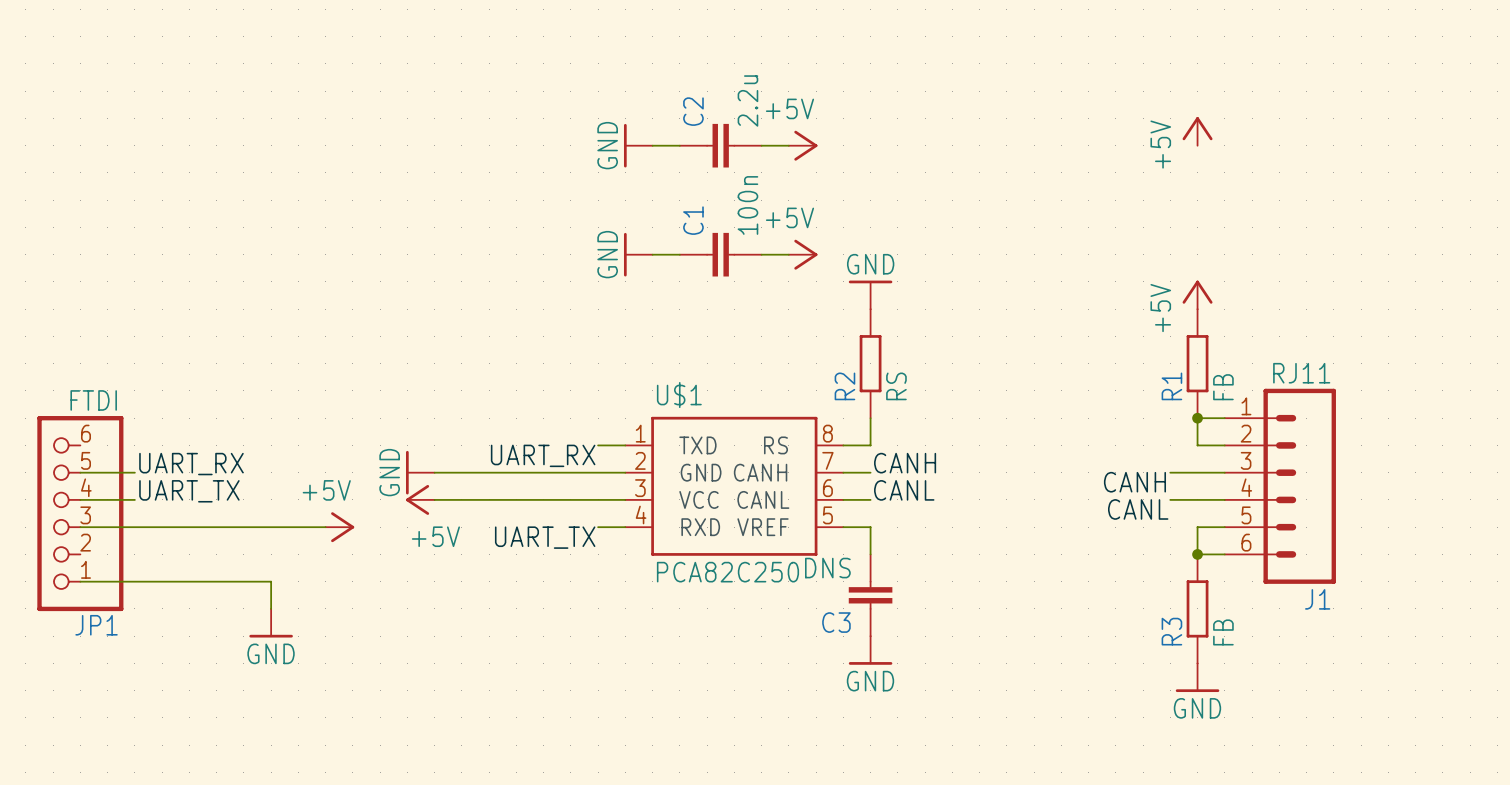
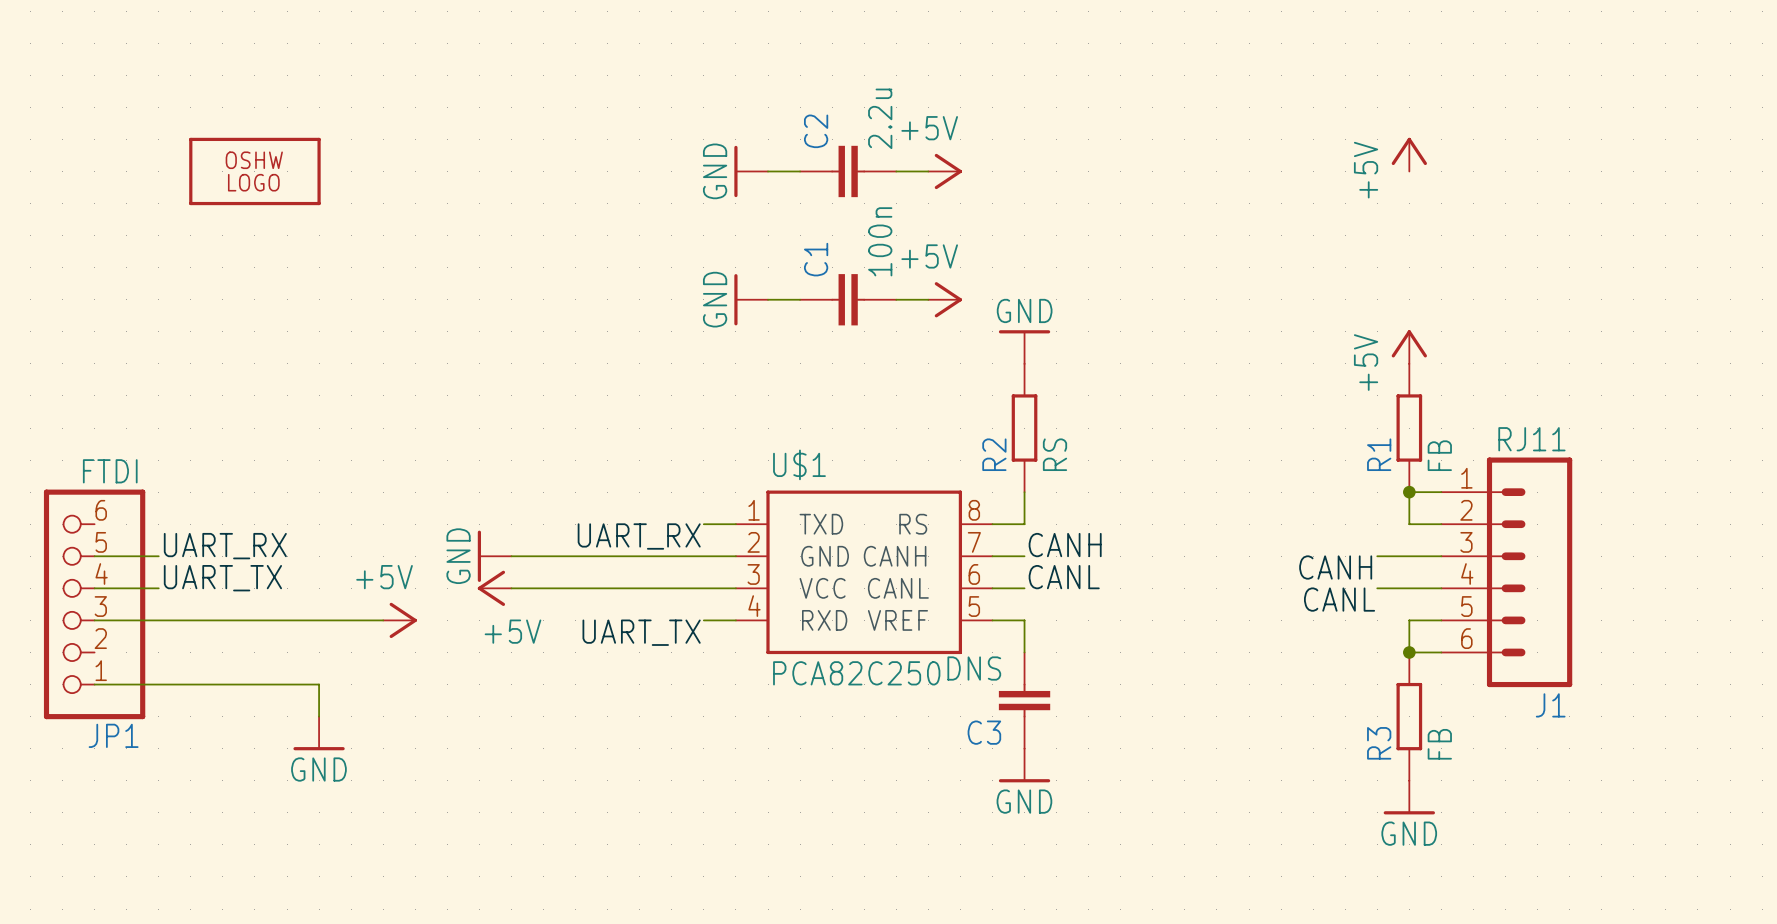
part: none -> (254, 171)

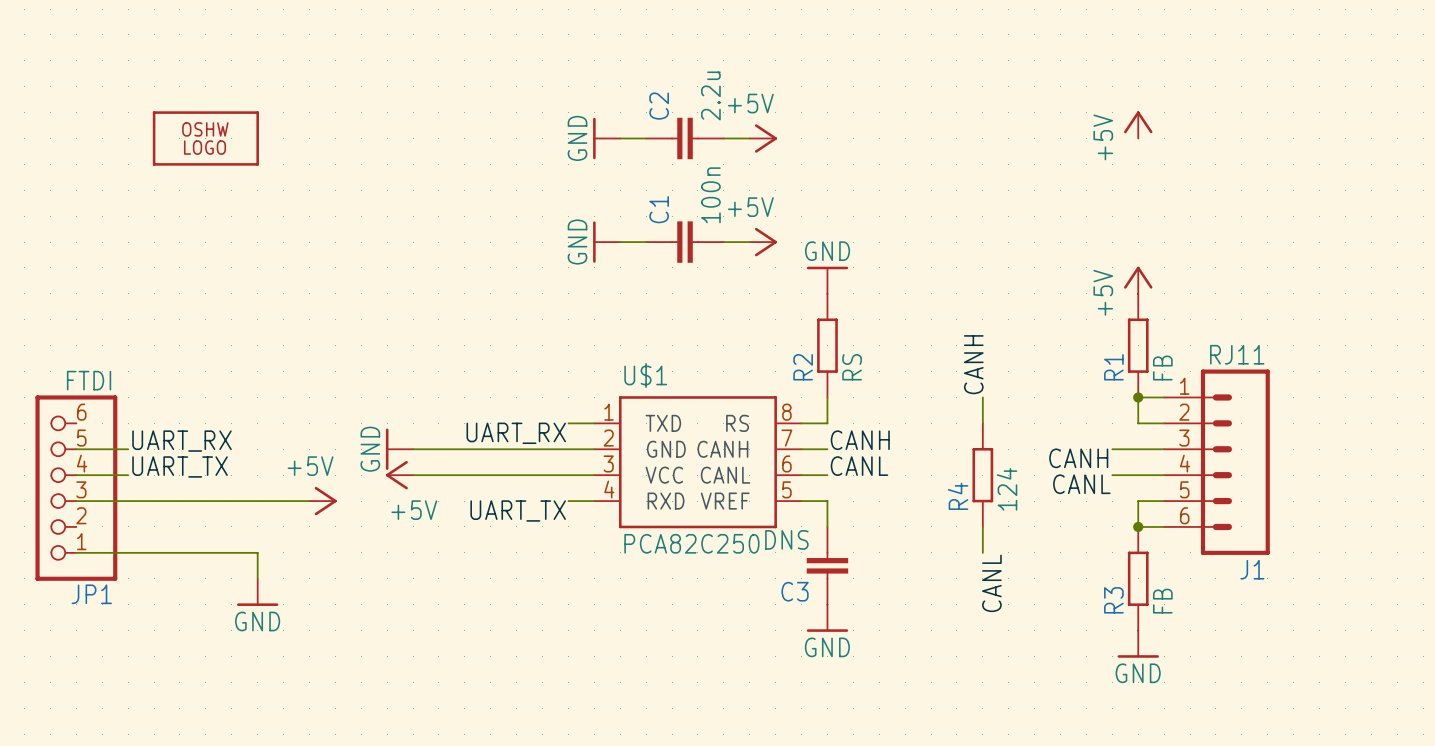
label: none -> CANH (973, 364)
wire: none -> (982, 397) (982, 423)
R4: none -> 124 (982, 475)
wire: none -> (982, 526) (982, 552)
label: none -> CANL (991, 583)

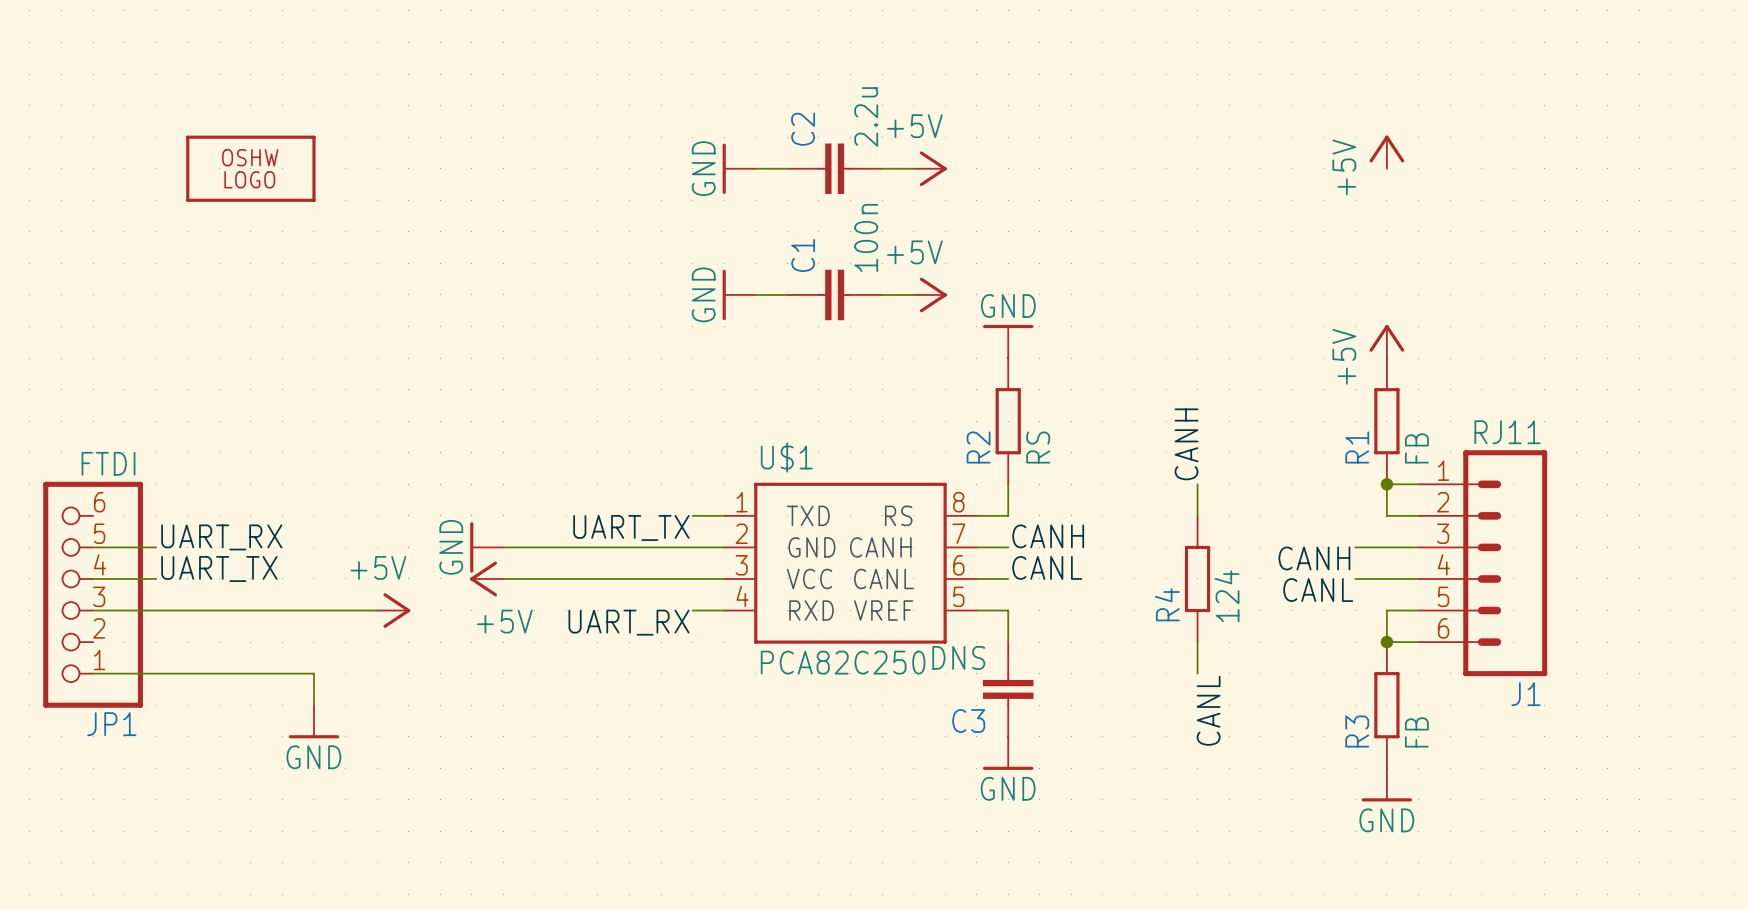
label: UART_RX (516, 433) -> UART_TX (631, 527)
label: UART_TX (518, 511) -> UART_RX (629, 622)

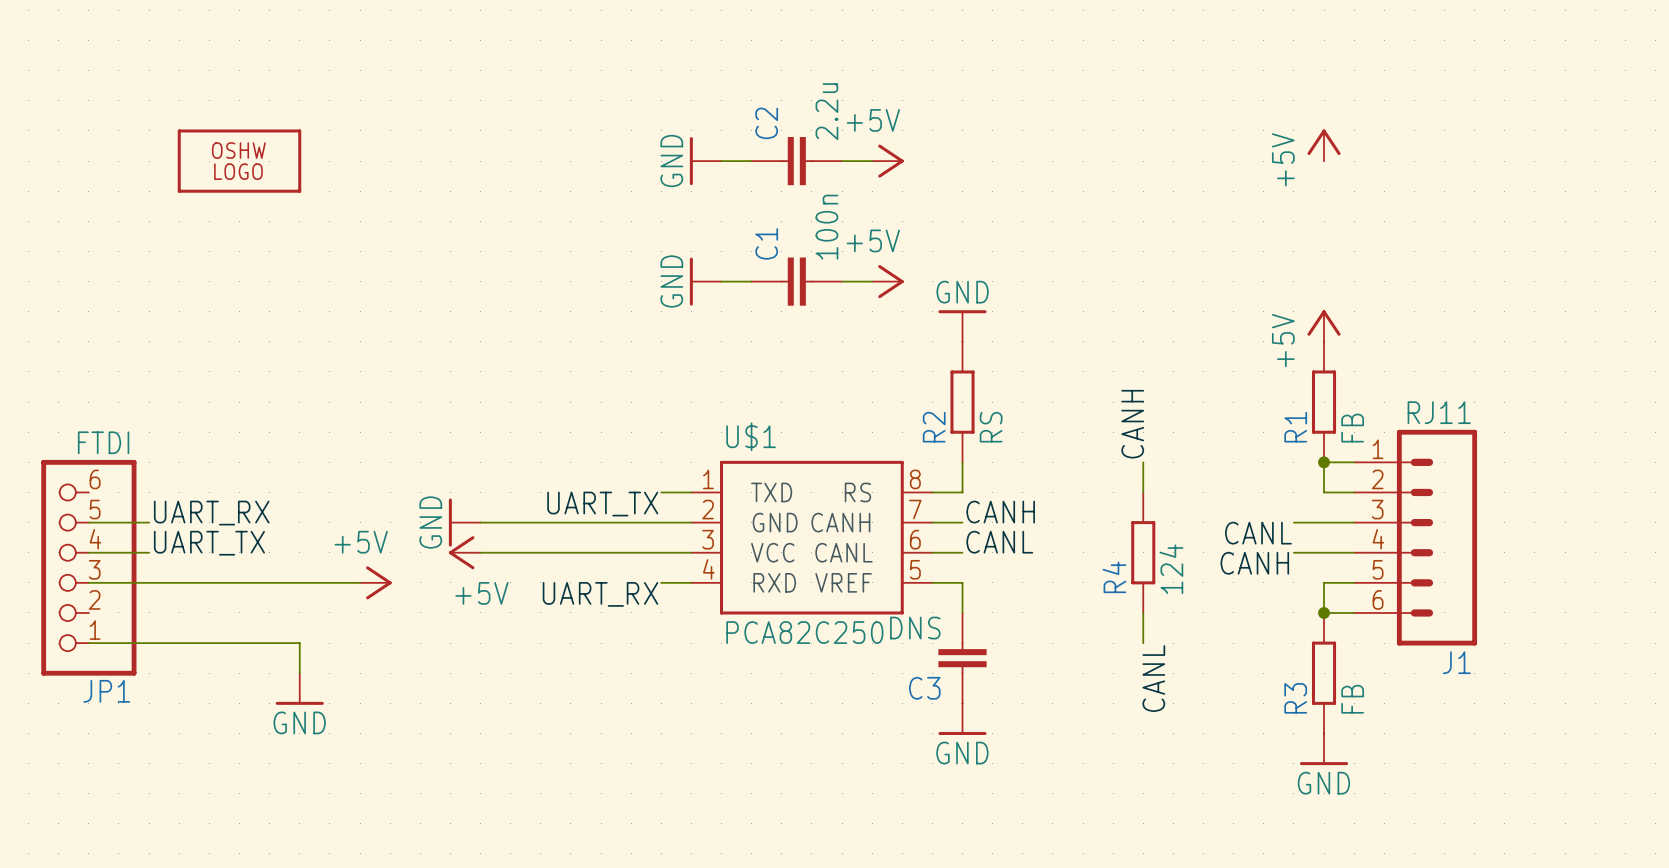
label: CANH (1314, 558) -> CANL (1258, 533)
label: CANL (1318, 590) -> CANH (1254, 563)

